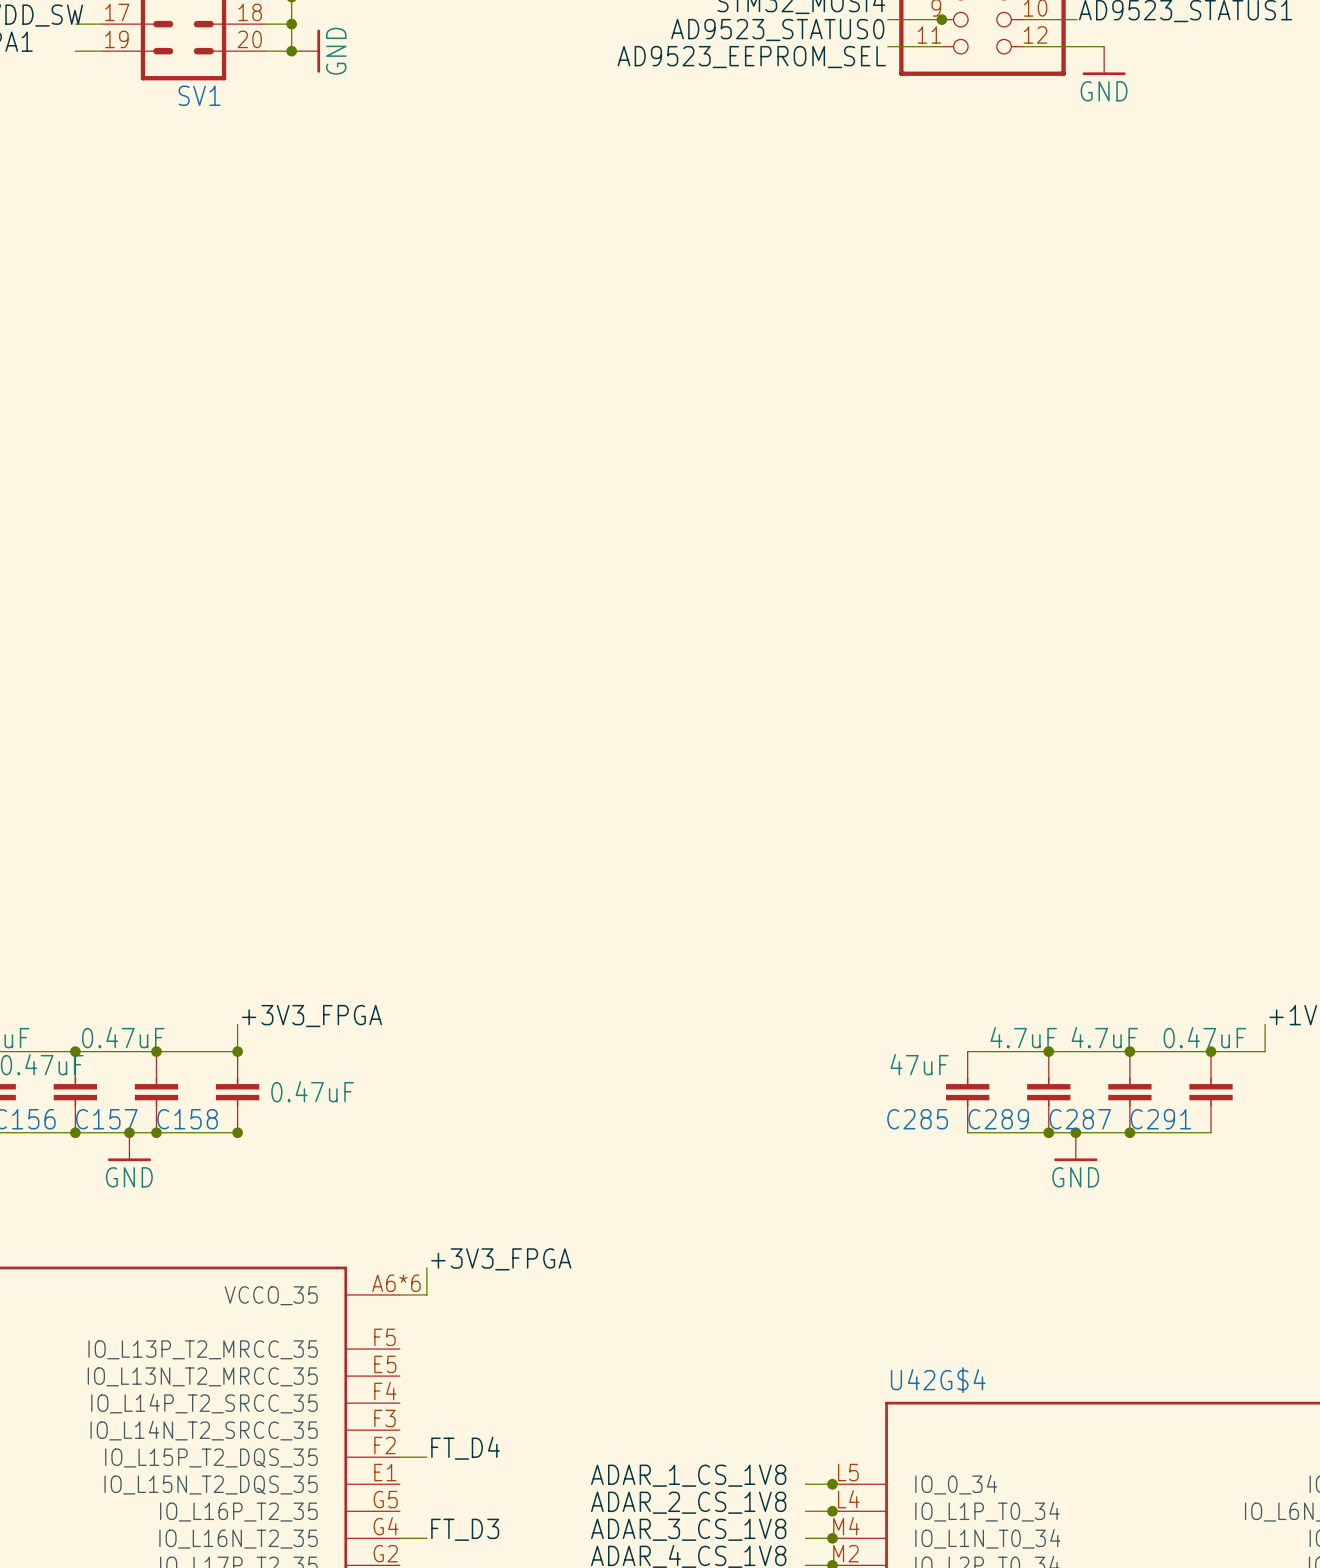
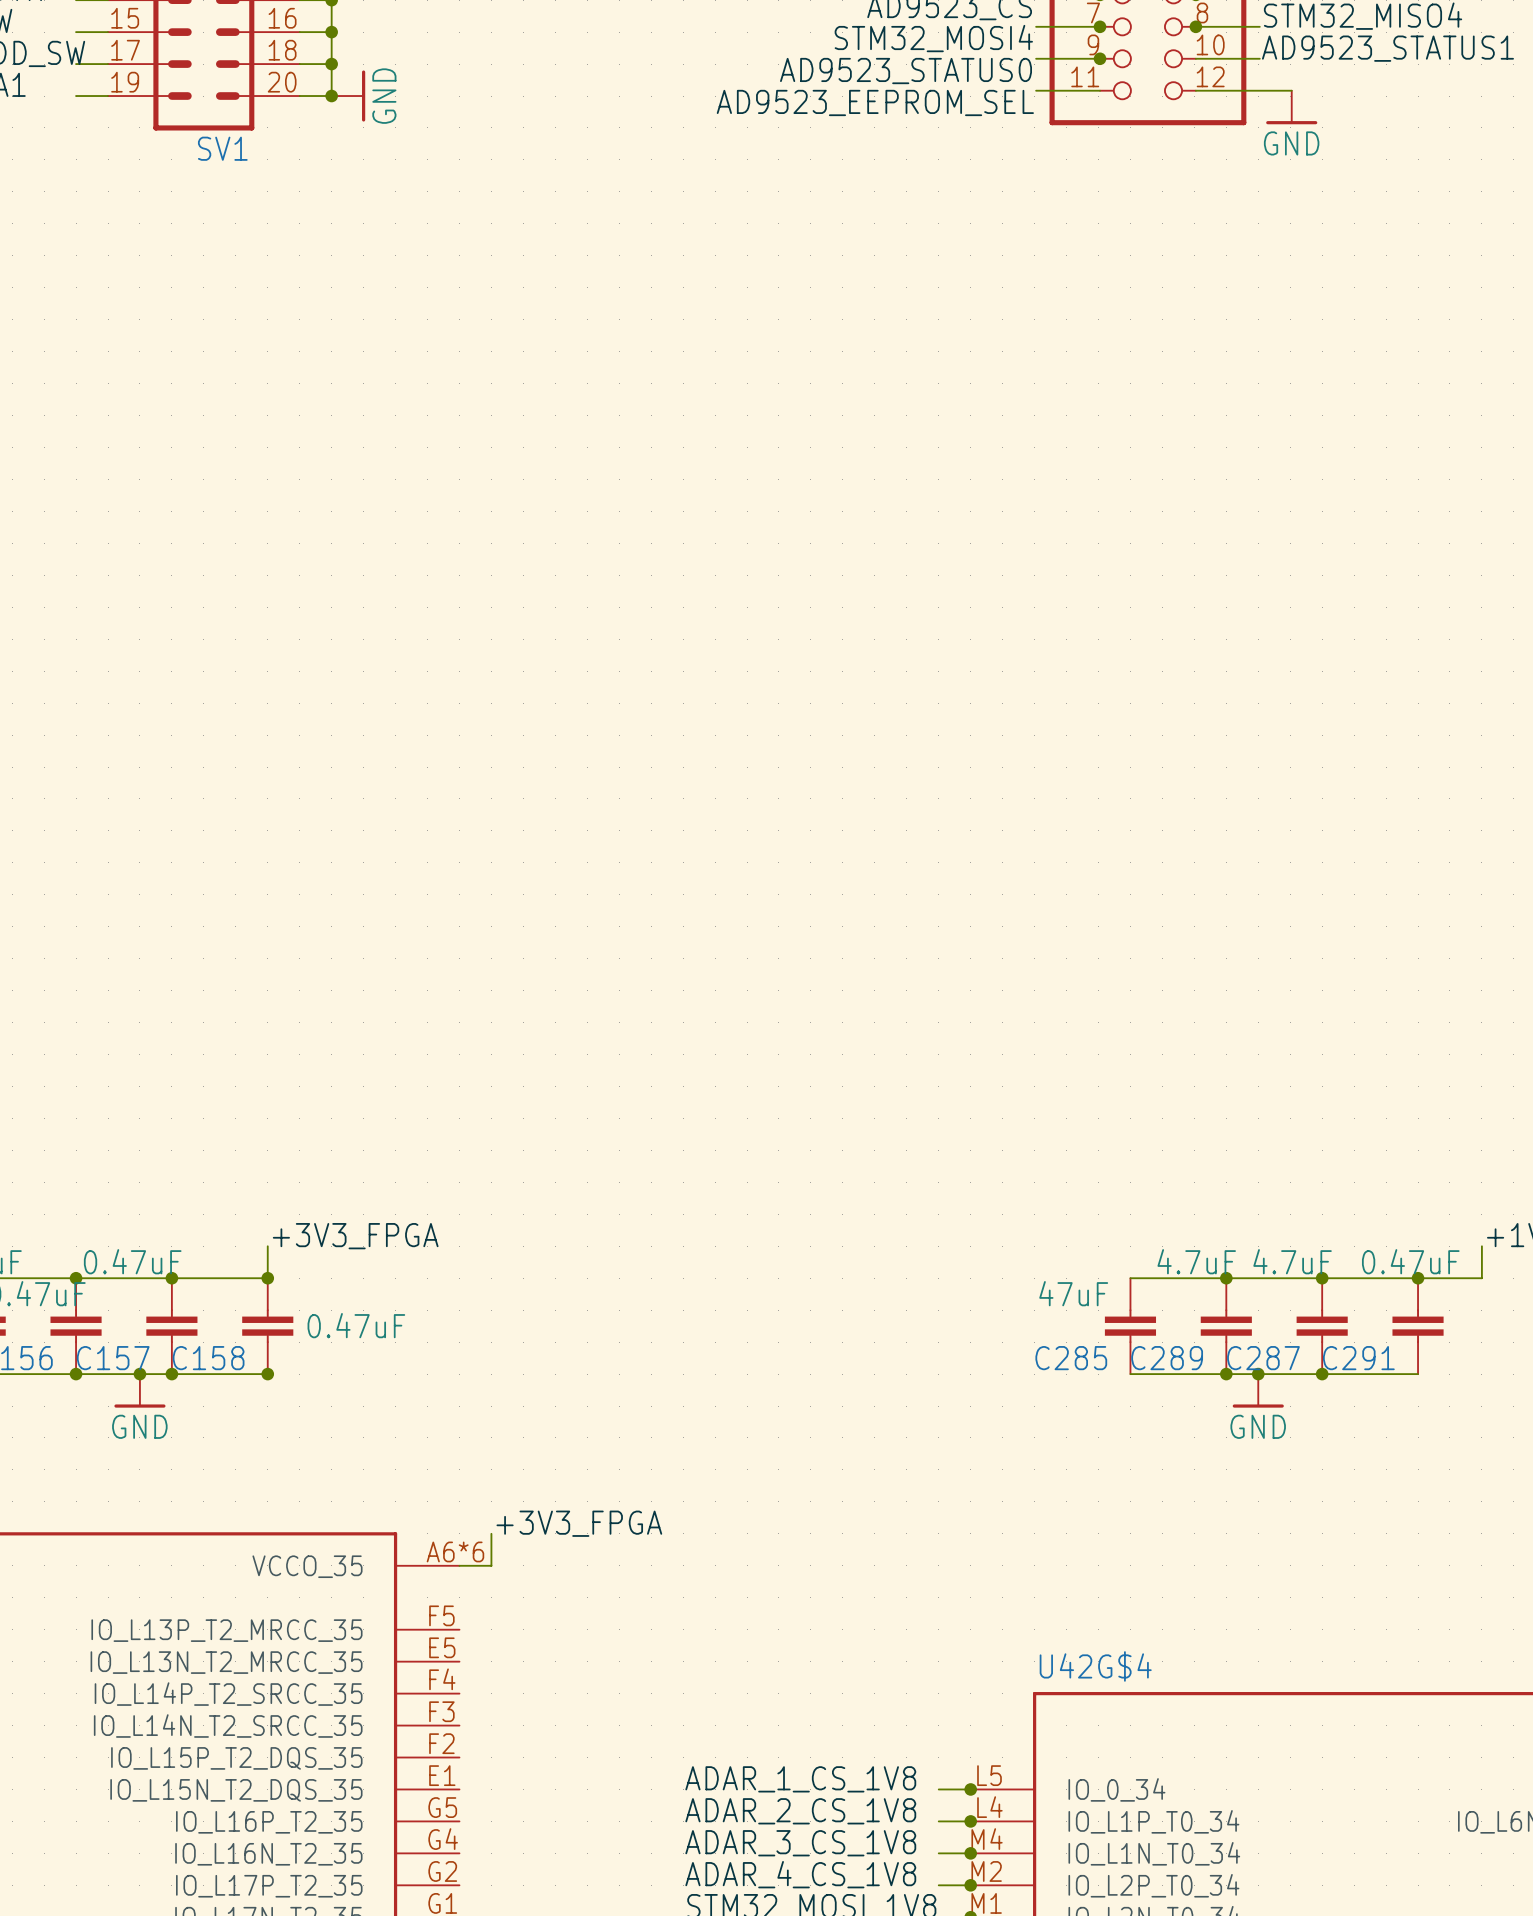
label: FT_D4 (465, 1448) -> none
wire: (399, 1457) (426, 1457) -> none
label: FT_D3 (465, 1529) -> none
wire: (399, 1538) (426, 1538) -> none

